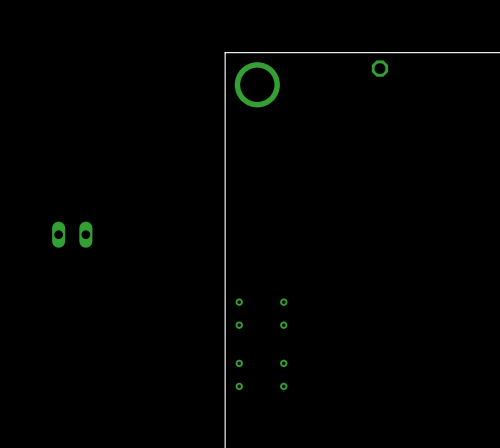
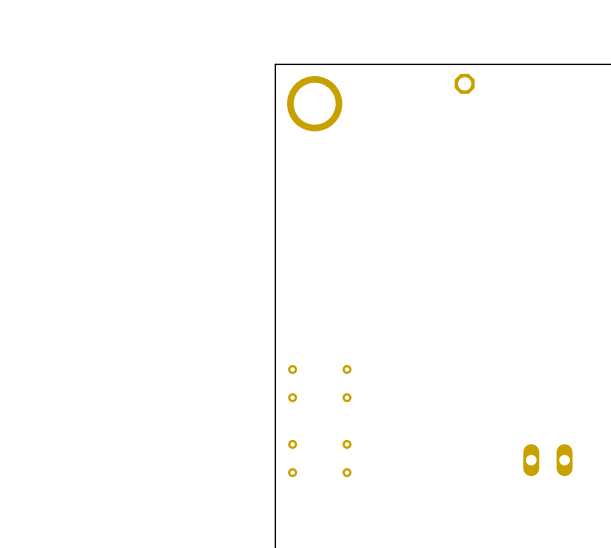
part: (72, 234) -> none
part: none -> (547, 460)

